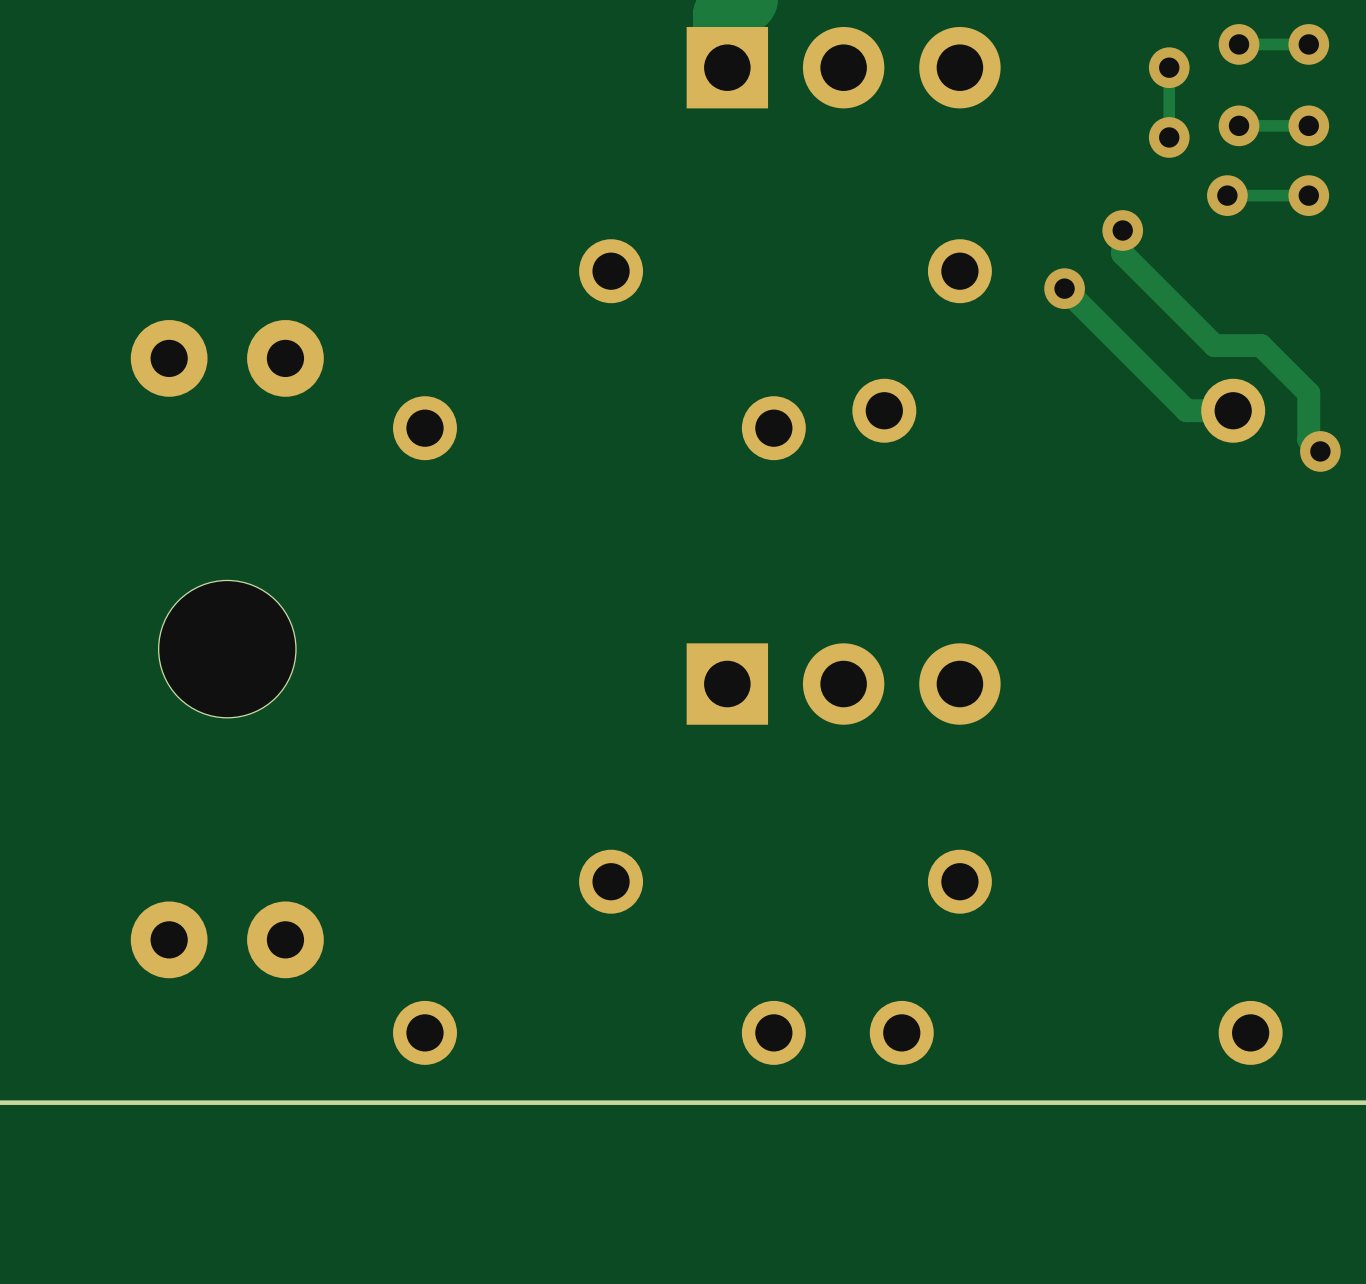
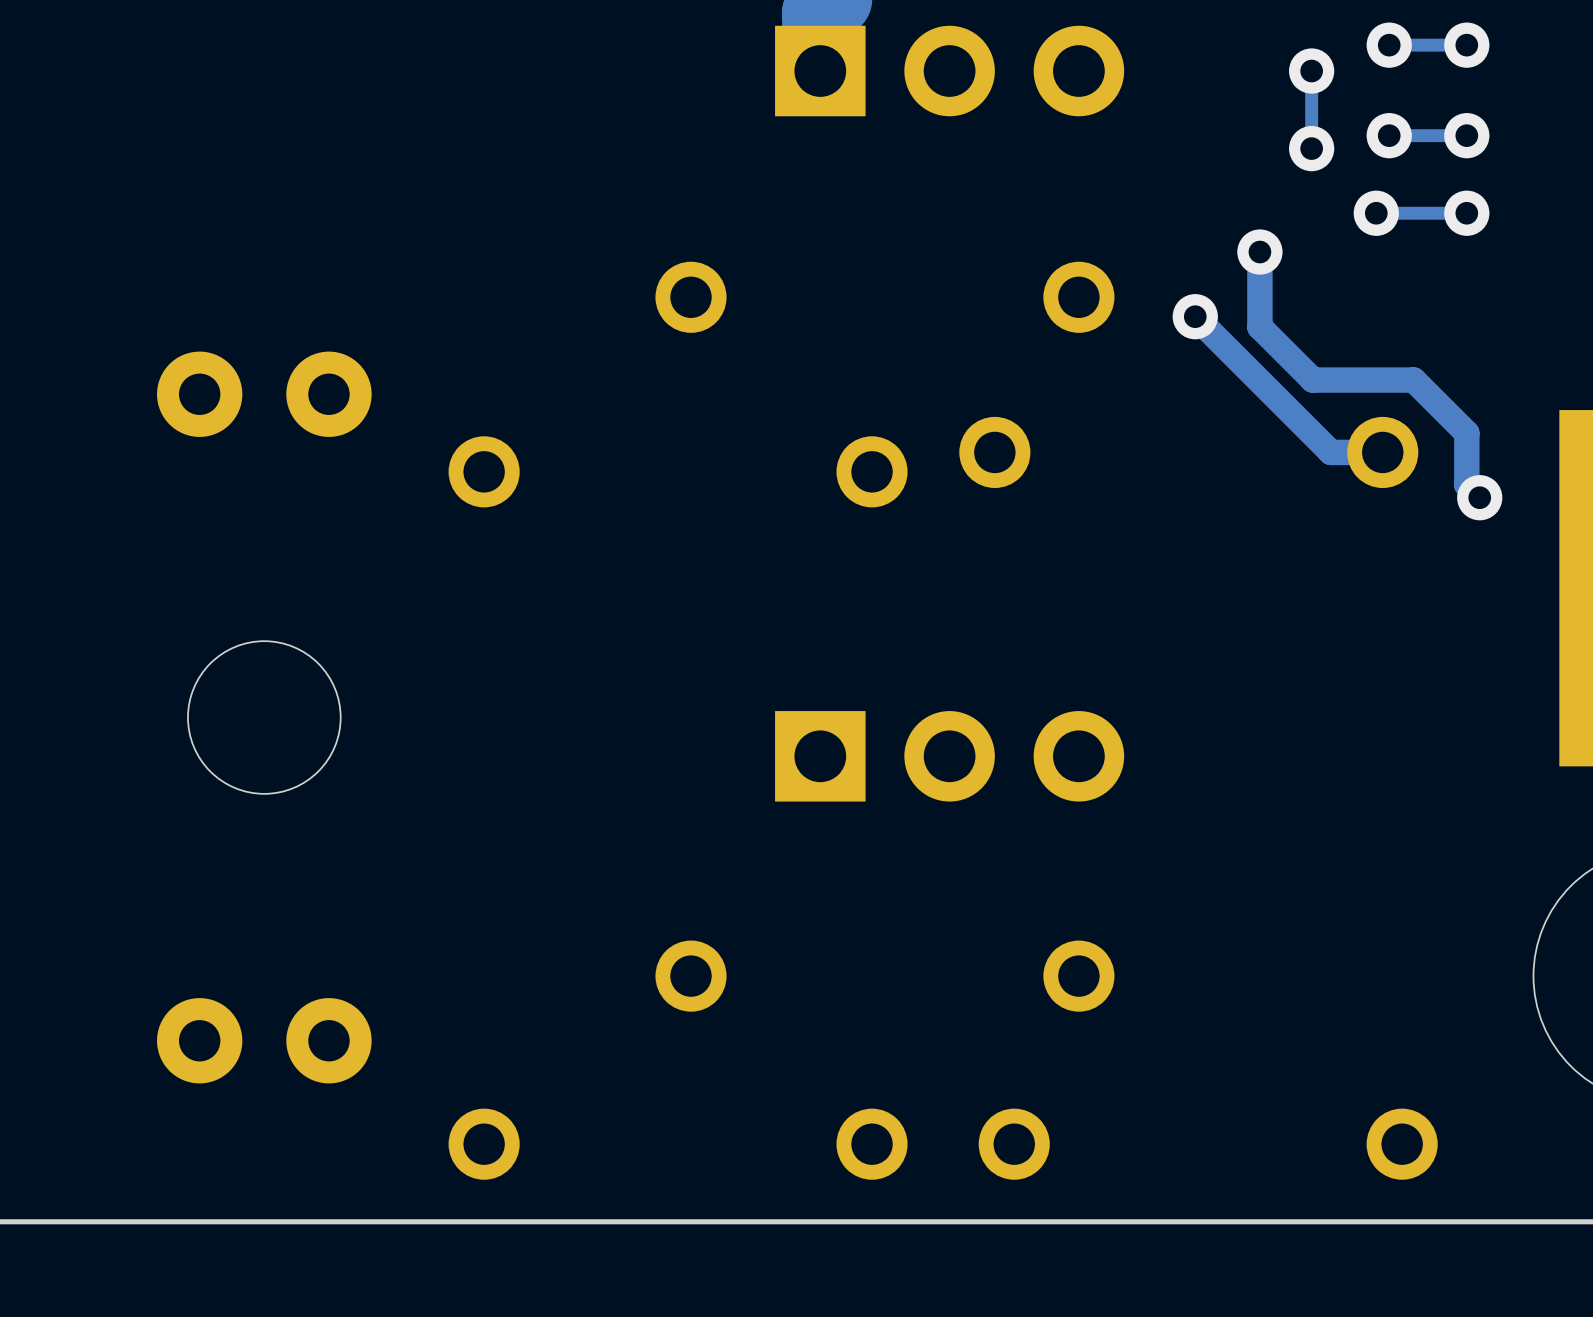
track: (1122, 253) (1214, 345) -> (1259, 277) (1259, 327) (1312, 380) (1362, 380)

